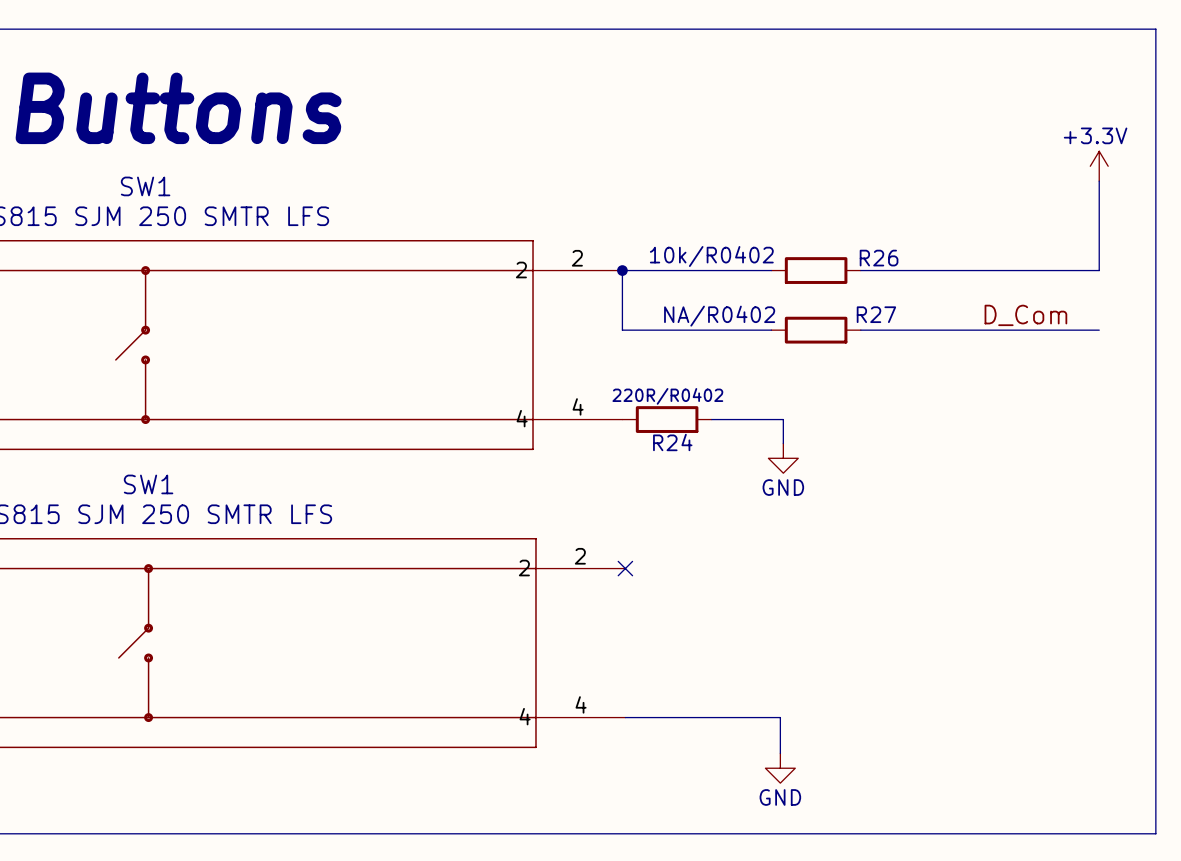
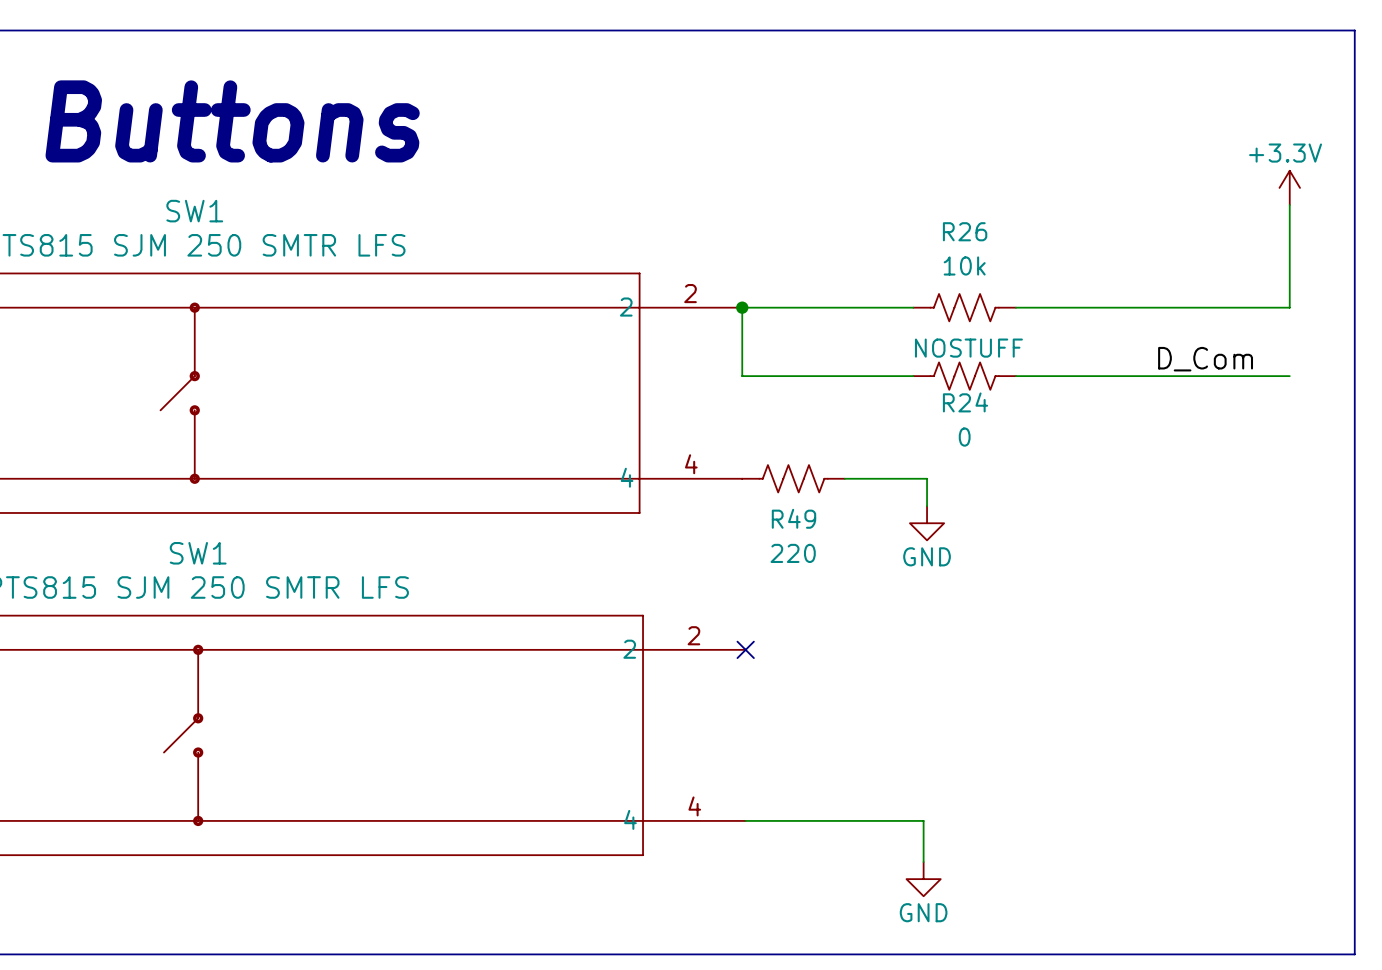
R26 value: 10k/R0402 (711, 256) -> 10k (964, 265)
R26 symbol: [771, 257, 861, 284] -> [913, 293, 1017, 322]
R26 name position: R26 (879, 258) -> R26 (965, 231)
R24 text: none -> NOSTUFF (968, 348)
R27: NA/R0402 (816, 330) -> none
R24 value: 220R/R0402 (667, 396) -> 0 (964, 437)
R24 symbol: [622, 406, 712, 433] -> [913, 362, 1017, 390]
R49: none -> 220 (793, 478)

